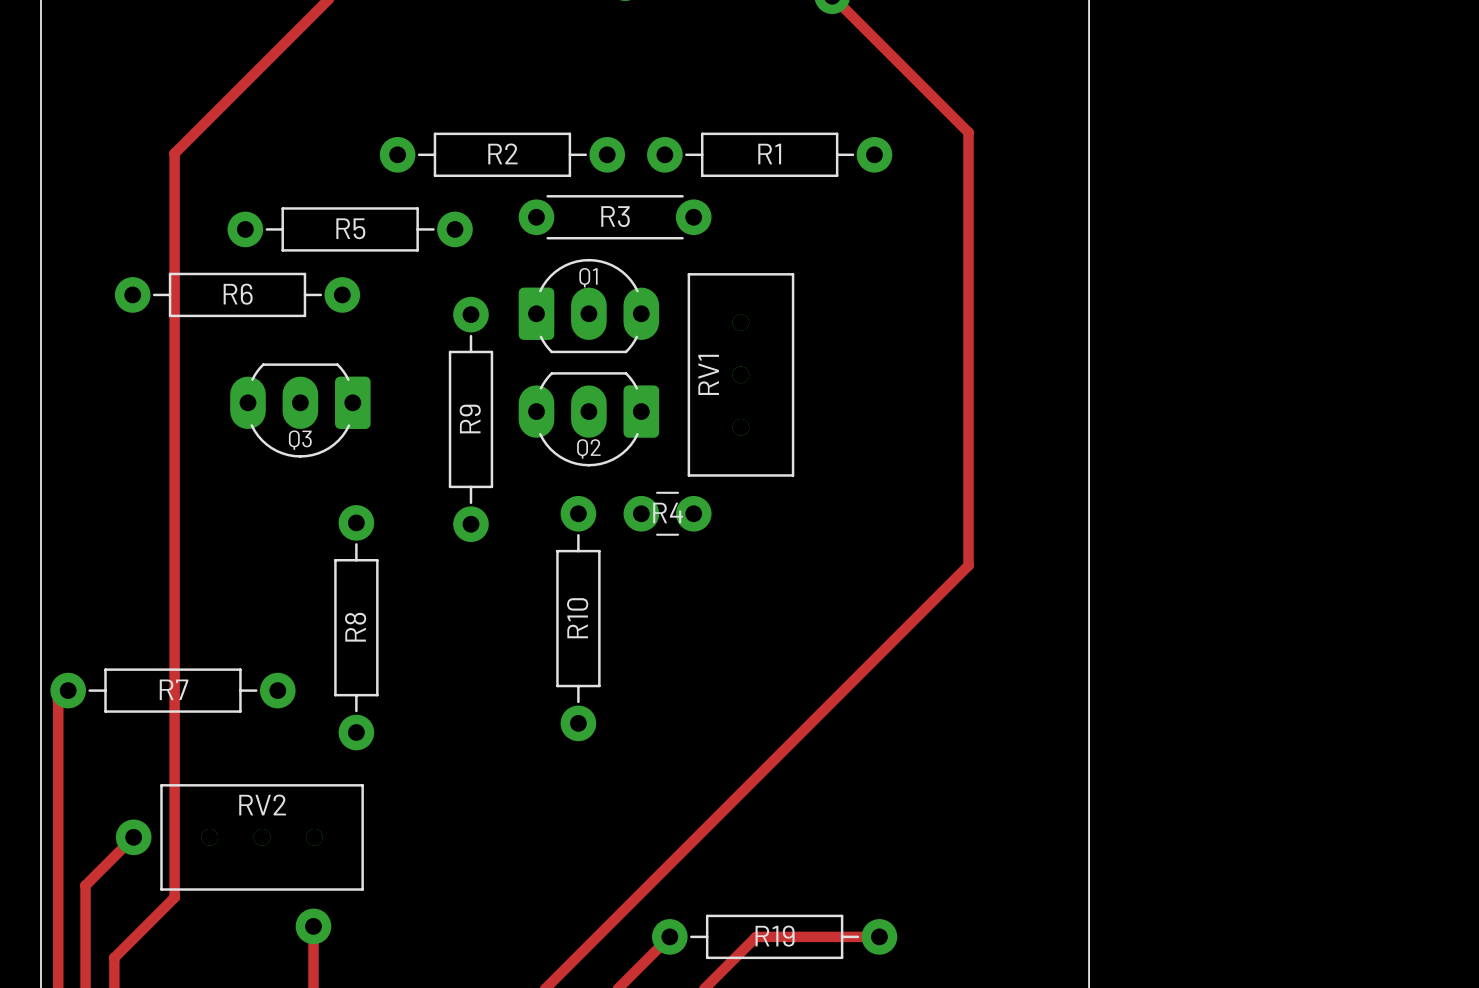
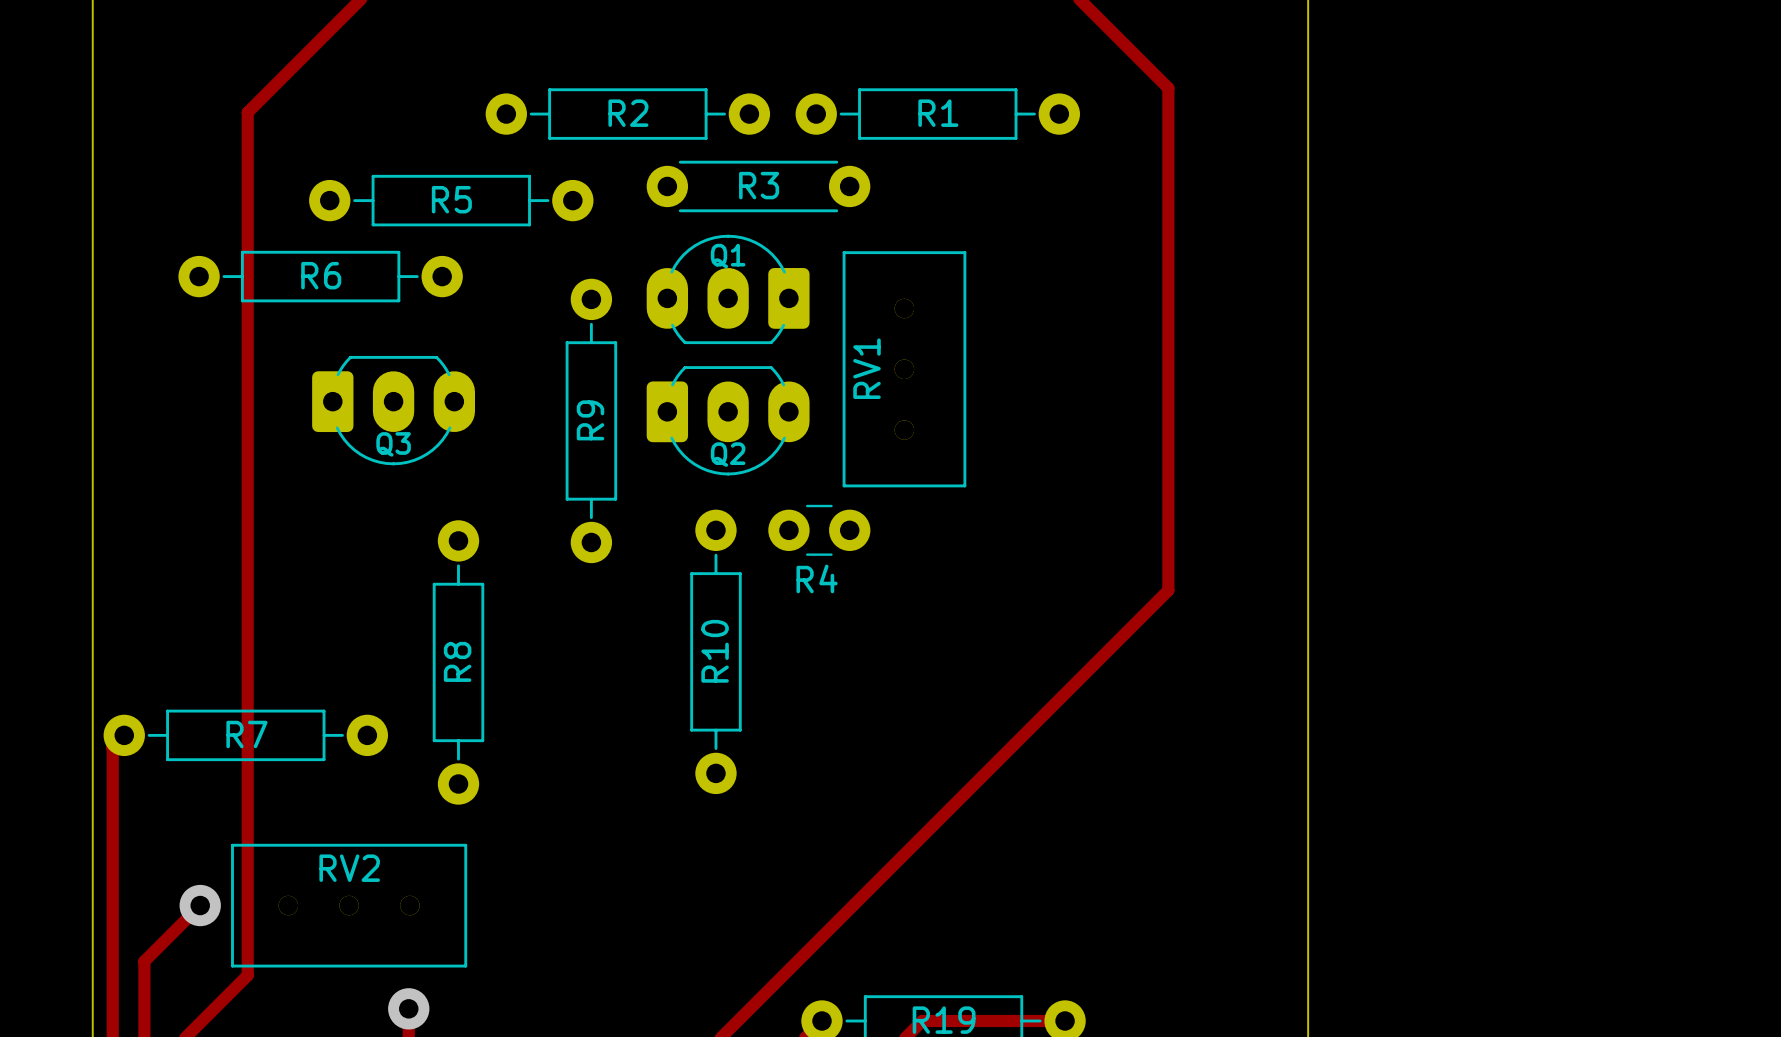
Q1 footprint: [518, 258, 660, 354] -> [646, 234, 810, 345]
Q3 footprint: [230, 363, 371, 458] -> [312, 355, 476, 466]
Q2 footprint: [518, 372, 660, 467] -> [646, 366, 810, 476]
R4 name position: R4 (668, 512) -> R4 (817, 578)

